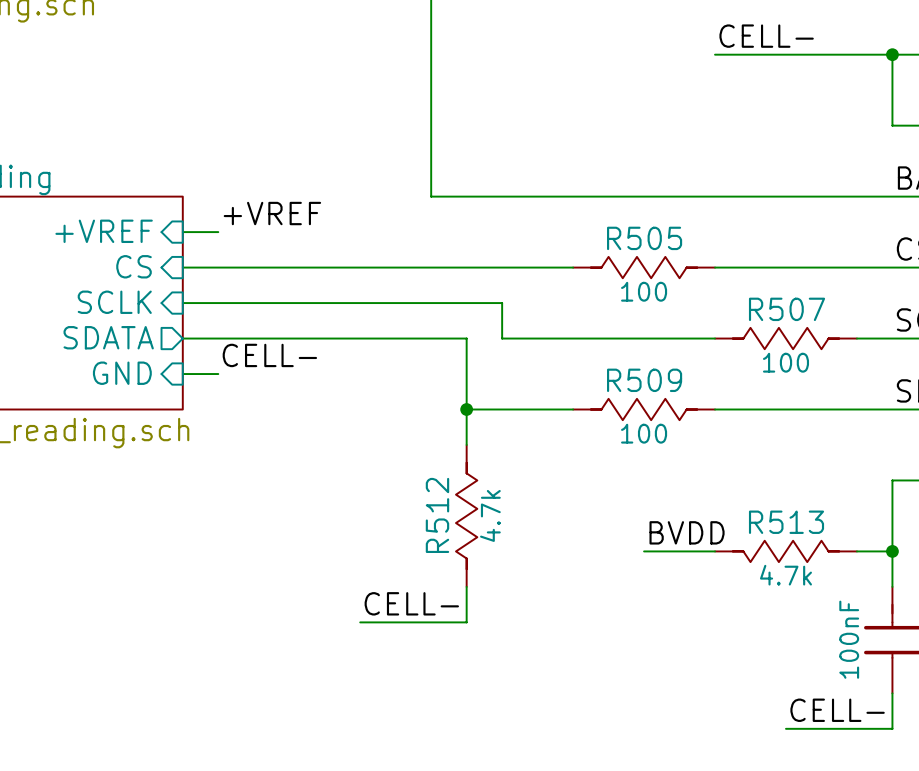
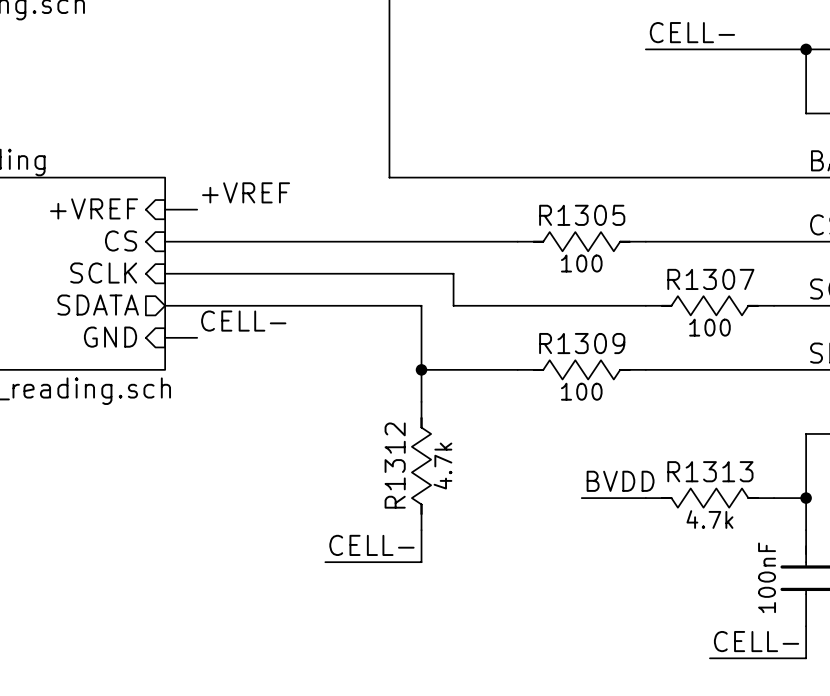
R505 name: R505 (644, 238) -> R1305 (582, 215)
R507 name: R507 (787, 309) -> R1307 (710, 279)
R509 name: R509 (644, 380) -> R1309 (582, 343)
R512 name: R512 (437, 515) -> R1312 (395, 465)
R513 name: R513 (786, 522) -> R1313 (710, 471)

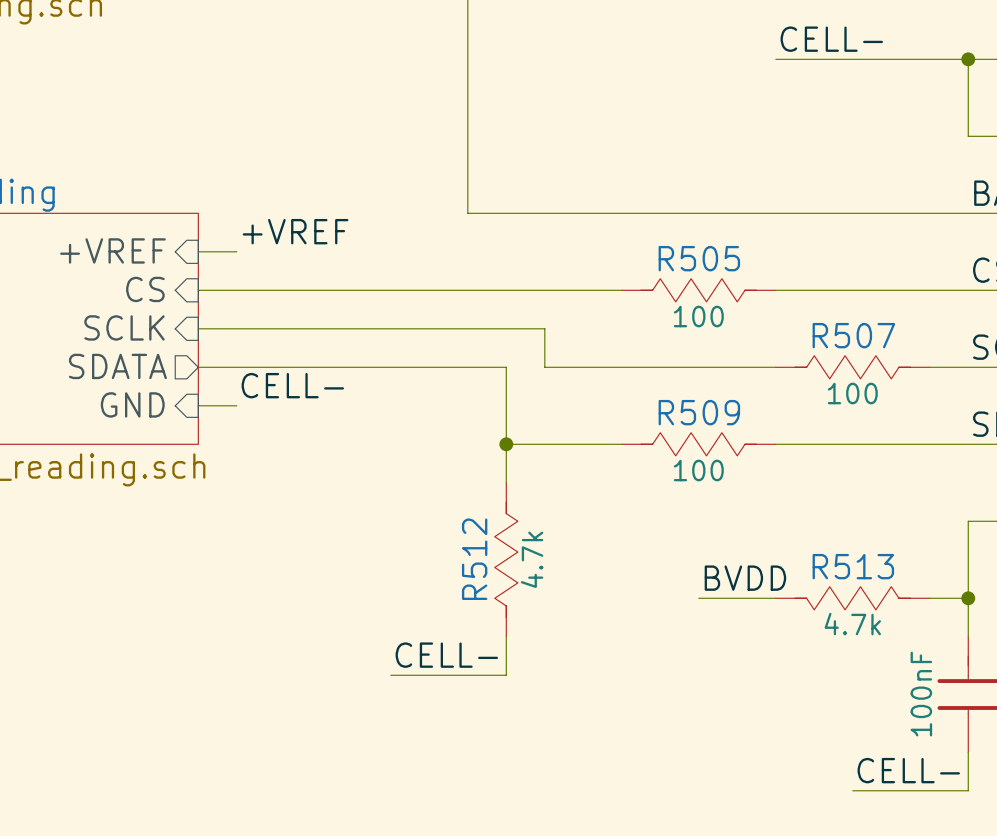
R1305 name: R1305 (582, 215) -> R505 (699, 258)
R1307 name: R1307 (710, 279) -> R507 (853, 335)
R1309 name: R1309 (582, 343) -> R509 (699, 412)
R1312 name: R1312 (395, 465) -> R512 (474, 559)
R1313 name: R1313 (710, 471) -> R513 (853, 566)

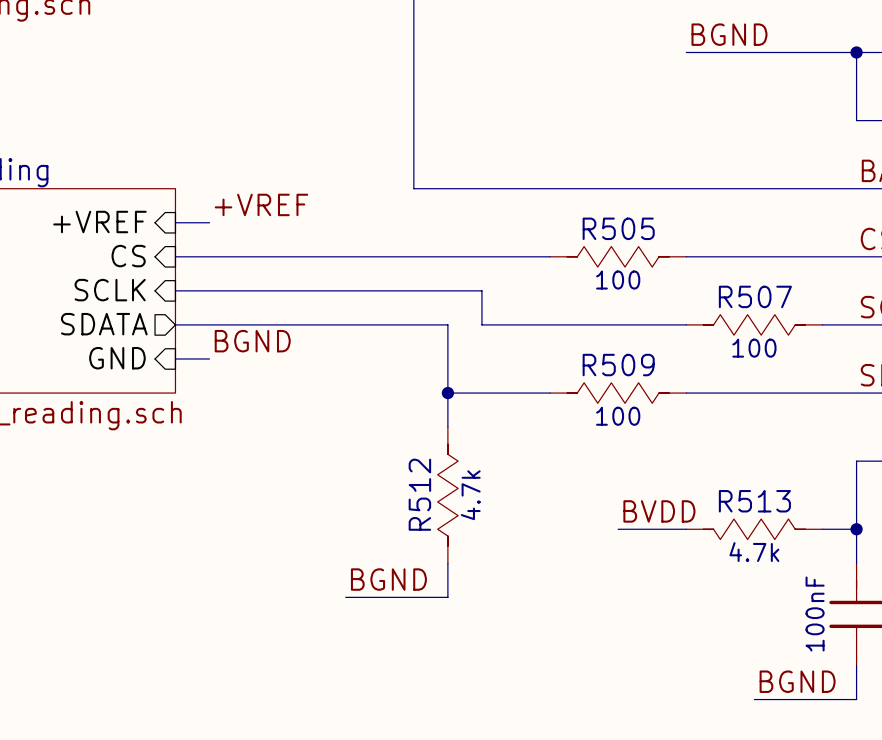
label: CELL- (831, 39) -> BGND (729, 34)
label: CELL- (292, 385) -> BGND (252, 341)
label: CELL- (446, 655) -> BGND (388, 579)
label: CELL- (908, 770) -> BGND (797, 681)

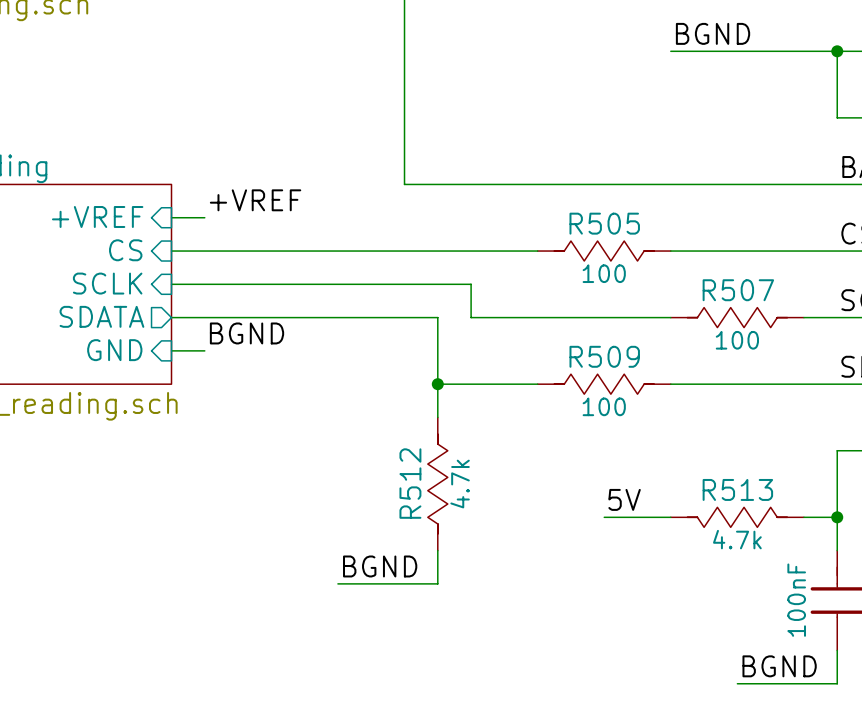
label: BVDD (659, 511) -> 5V (624, 499)

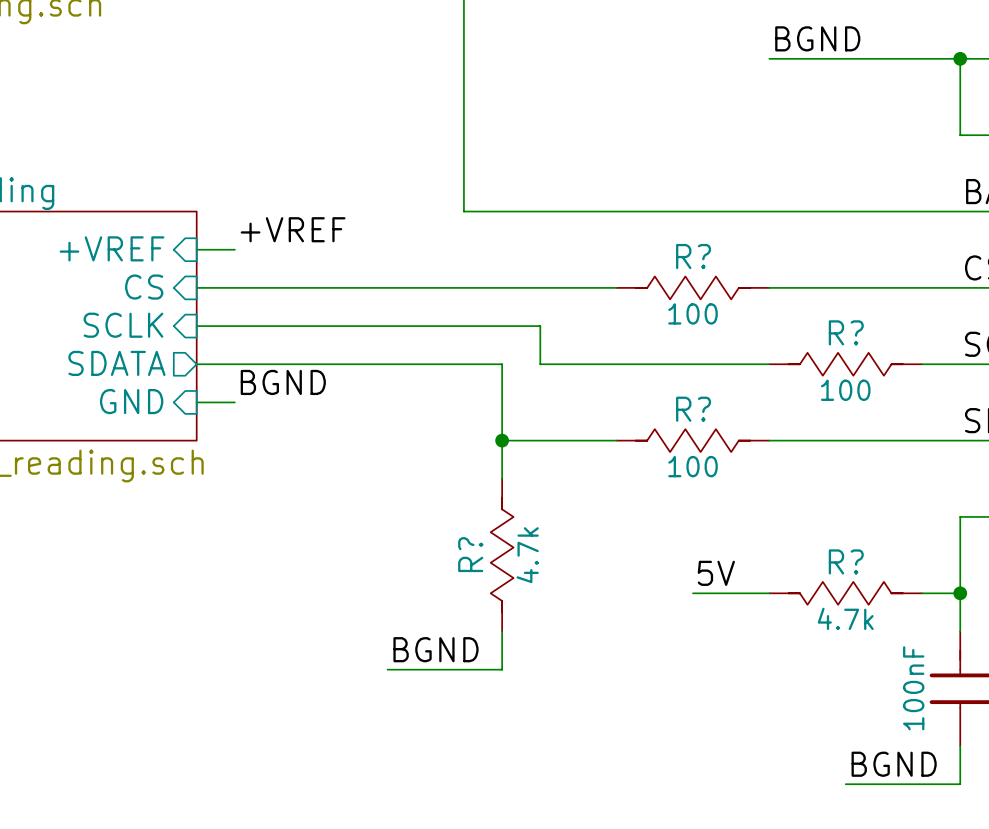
R505 name: R505 (604, 223) -> R? (693, 256)
R507 name: R507 (738, 290) -> R? (846, 332)
R509 name: R509 (604, 356) -> R? (693, 409)
R512 name: R512 (410, 483) -> R? (470, 554)
R513 name: R513 (737, 489) -> R? (846, 561)

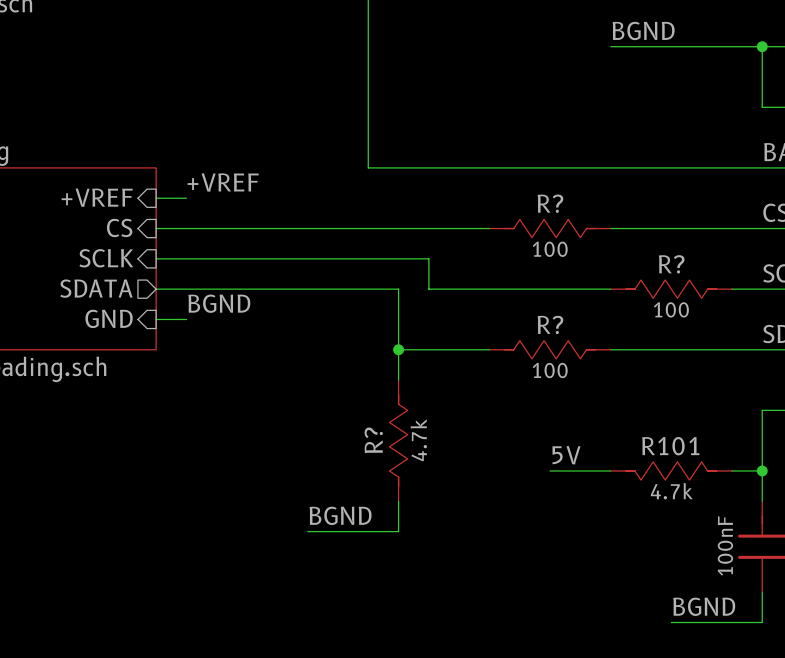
R? name: R? (846, 561) -> R101 (670, 446)

